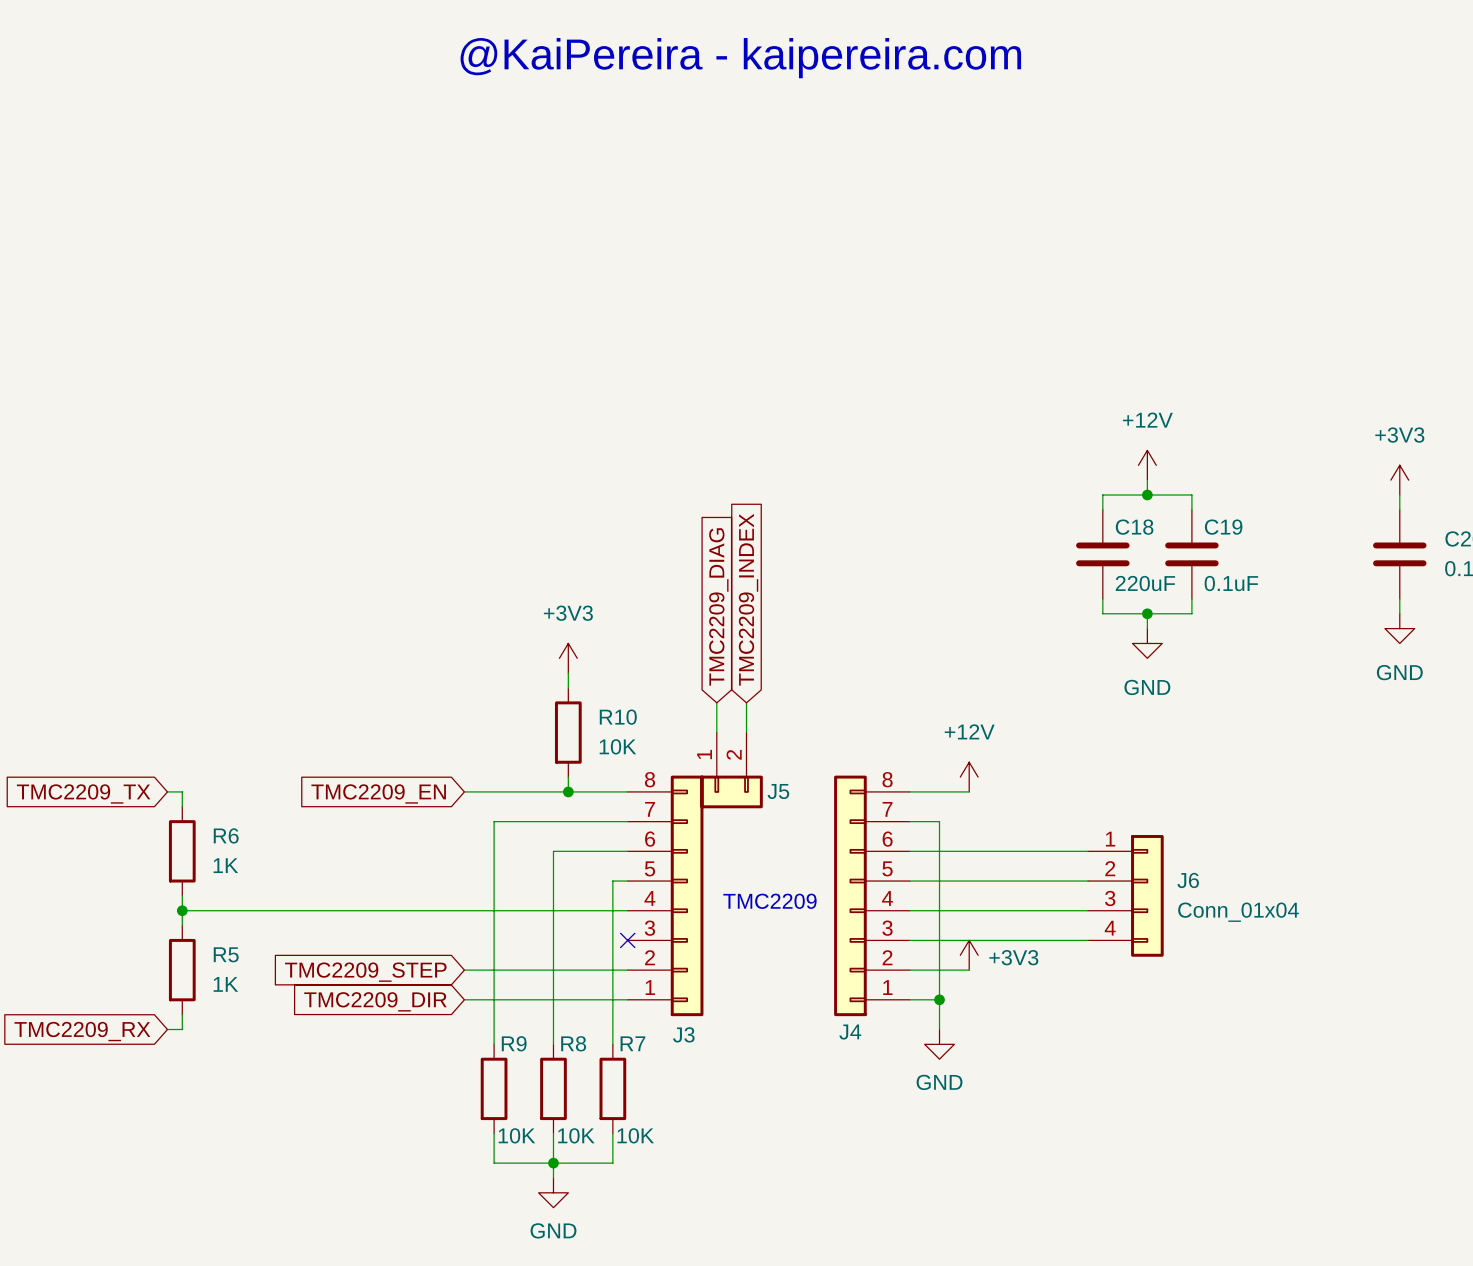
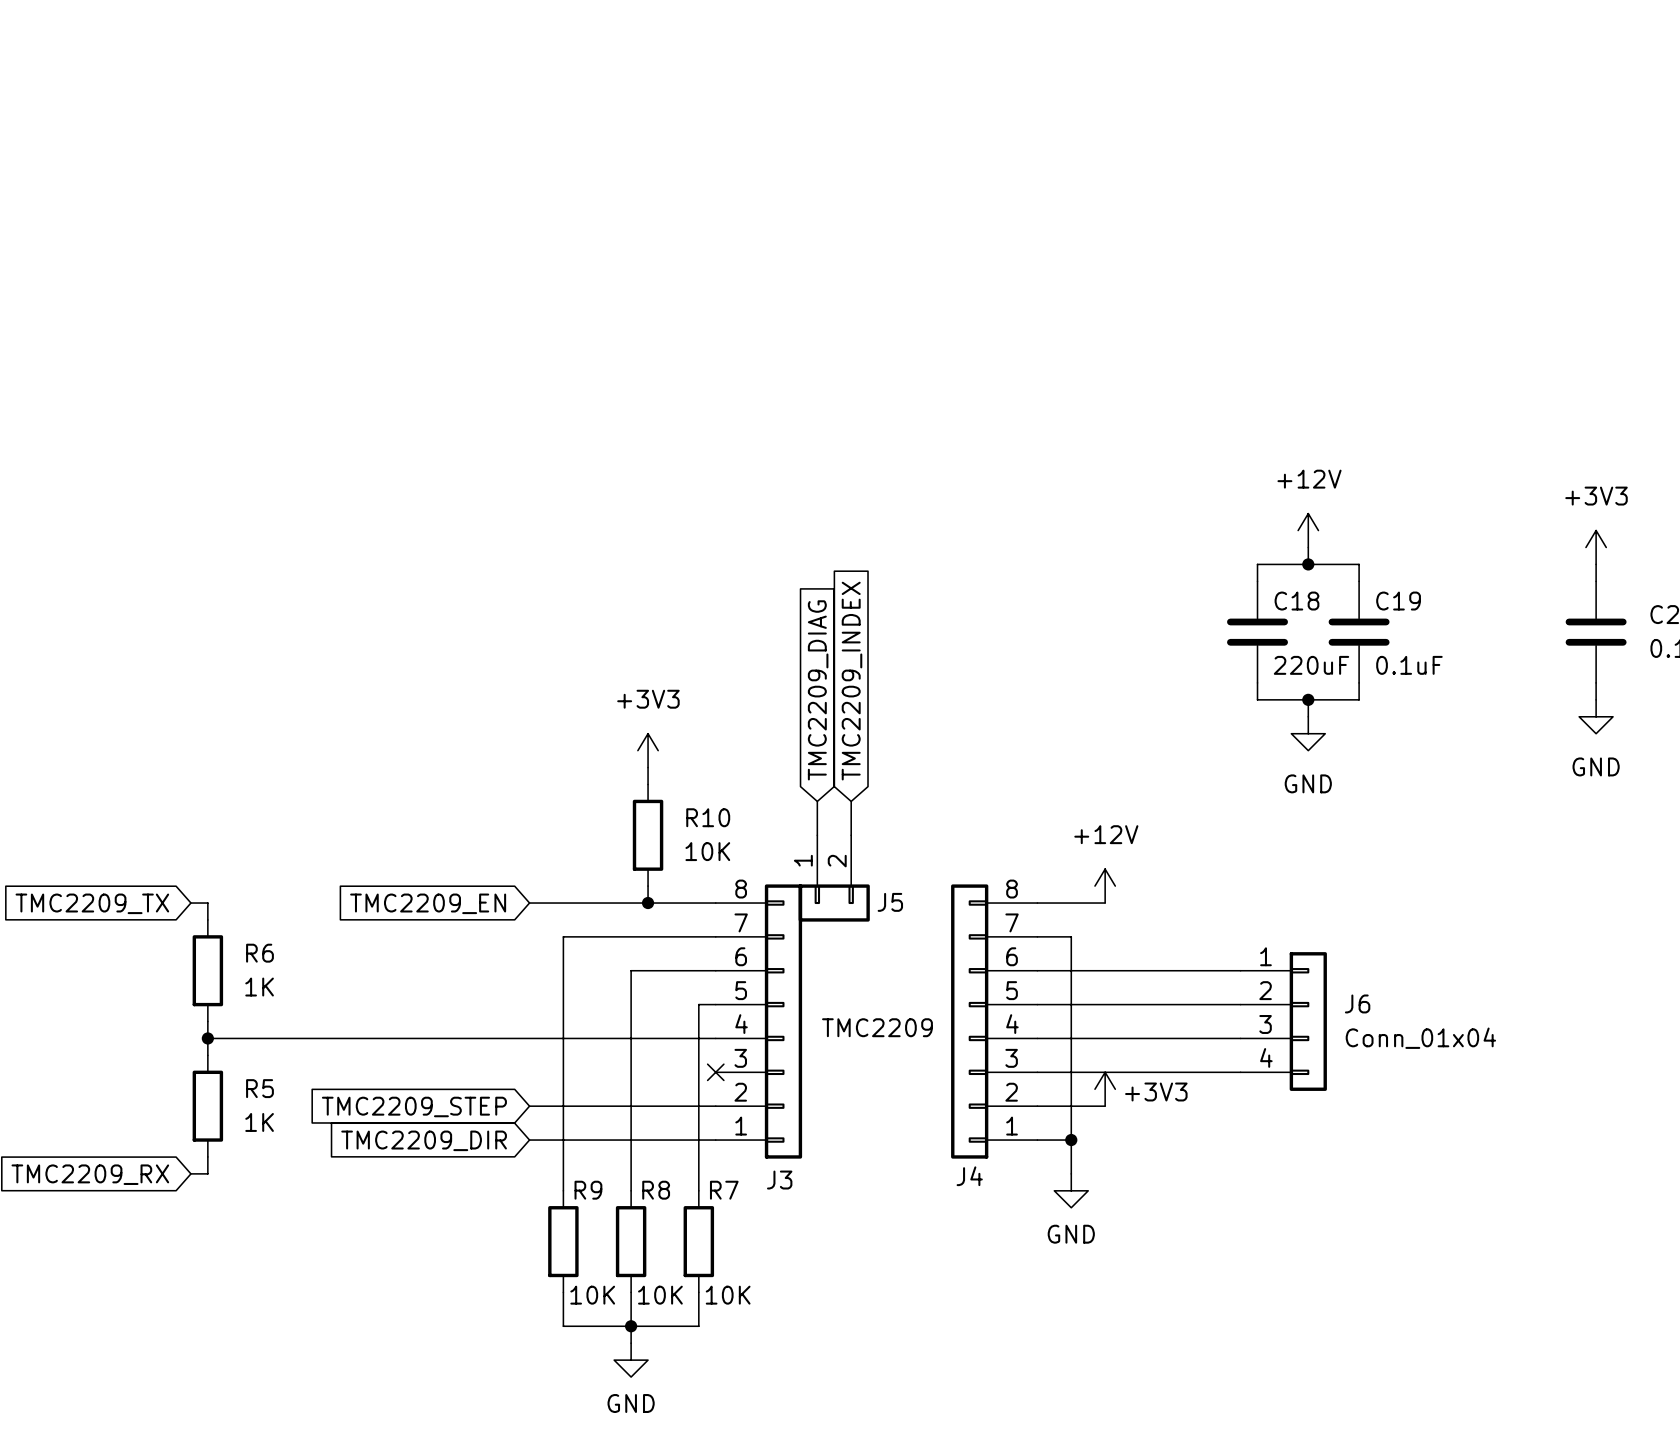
text: @KaiPereira - kaipereira.com (740, 58) -> none

